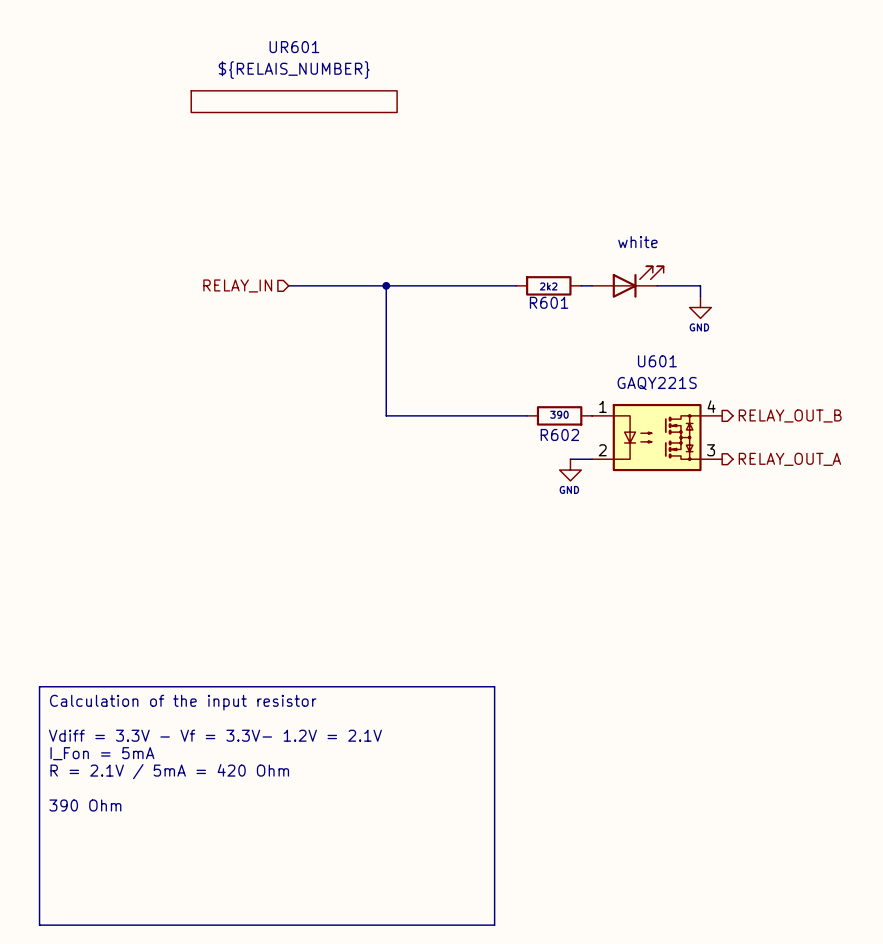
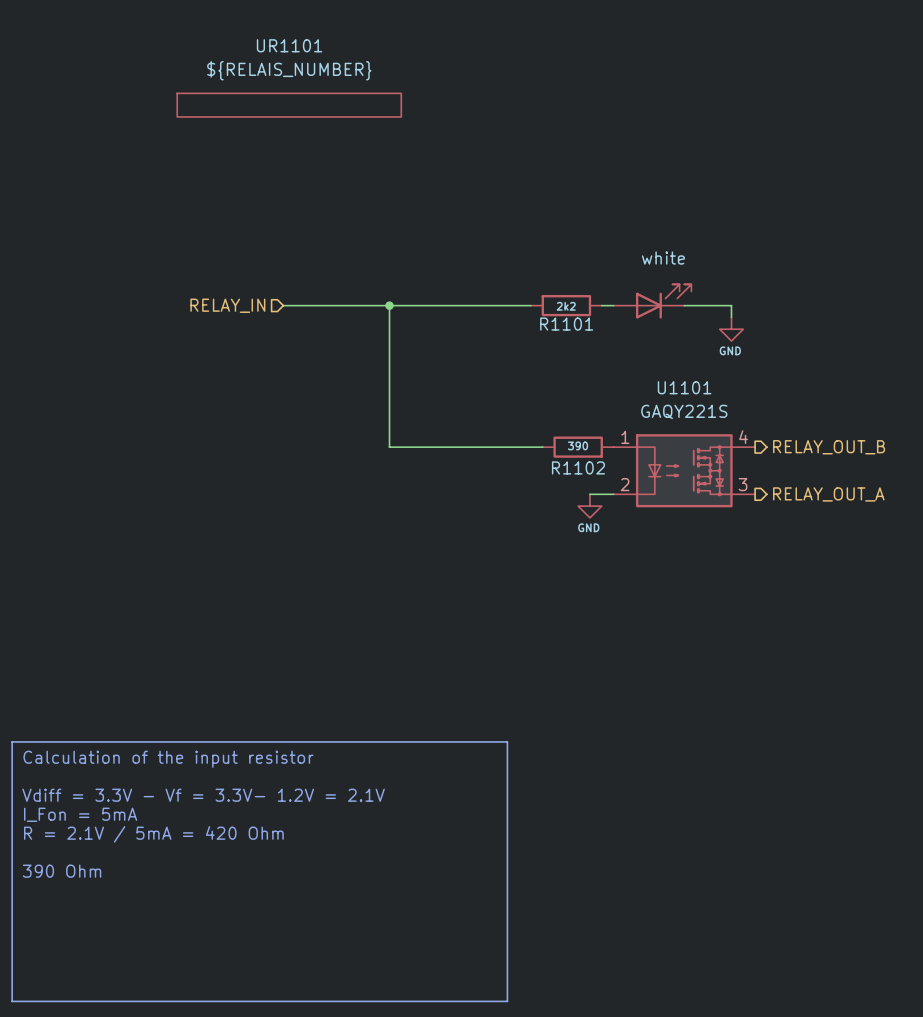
UR601 name: UR601 (294, 47) -> UR1101 (289, 45)
R601 name: R601 (549, 302) -> R1101 (566, 324)
U601 name: U601 (657, 361) -> U1101 (684, 387)
R602 name: R602 (559, 434) -> R1102 (578, 467)

